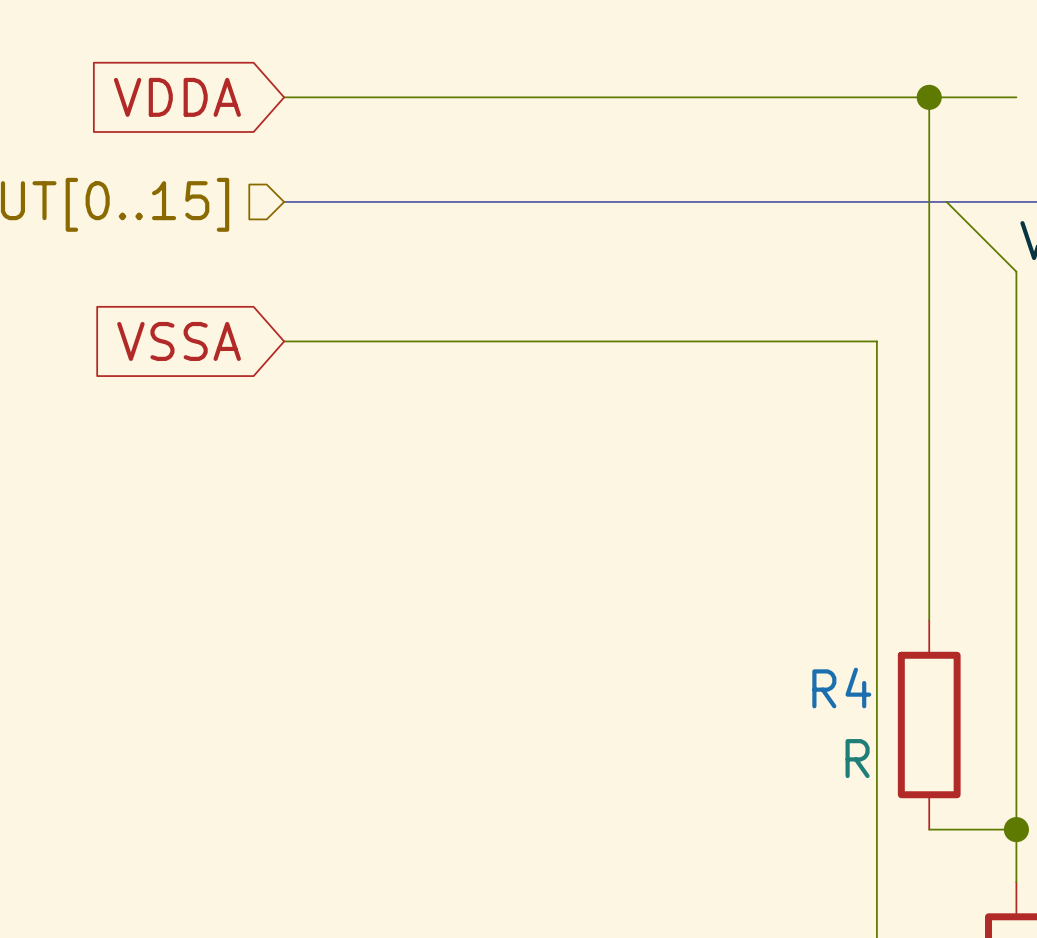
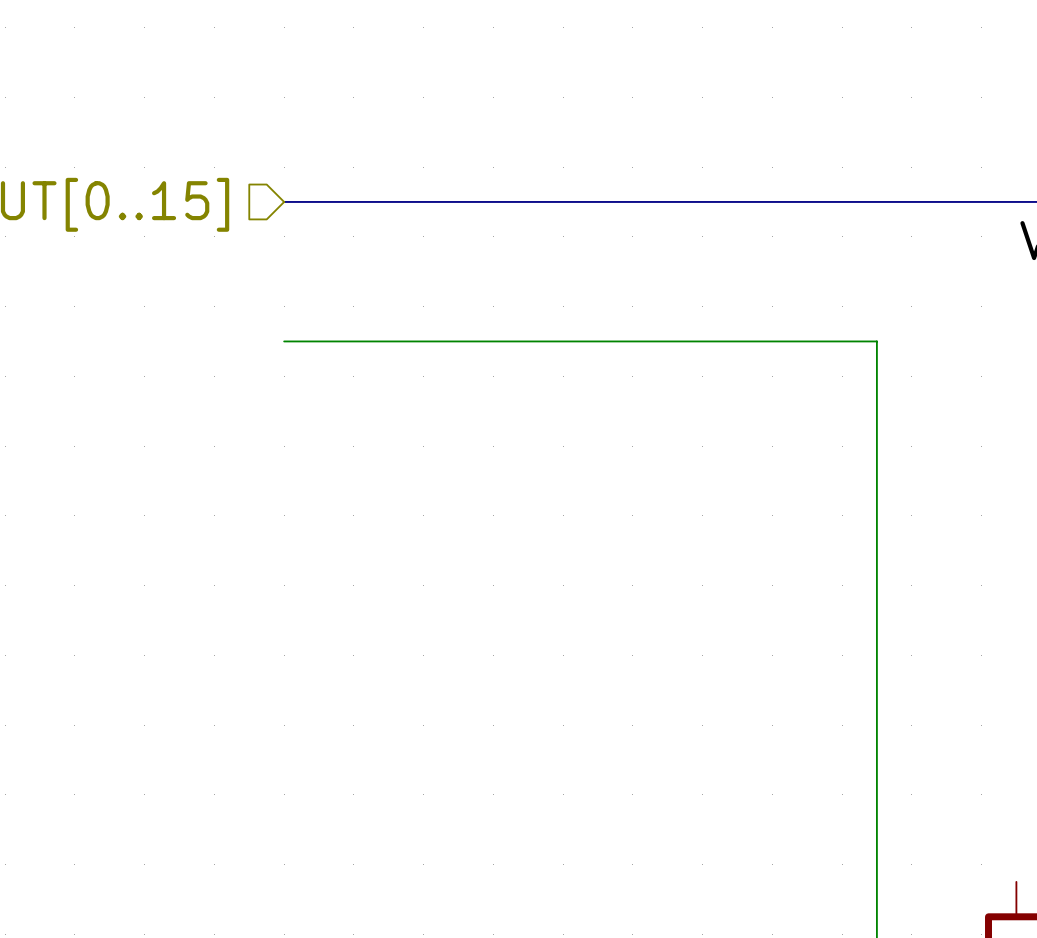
global label: VDDA (177, 97) -> none
wire: (284, 97) (1016, 97) -> none
wire: (929, 97) (929, 620) -> none
junction: (929, 97) -> none
wire: (946, 201) (1016, 271) (1016, 881) -> none
global label: VSSA (179, 341) -> none
R4: R (929, 725) -> none
wire: (929, 829) (1016, 829) -> none
junction: (1016, 829) -> none

